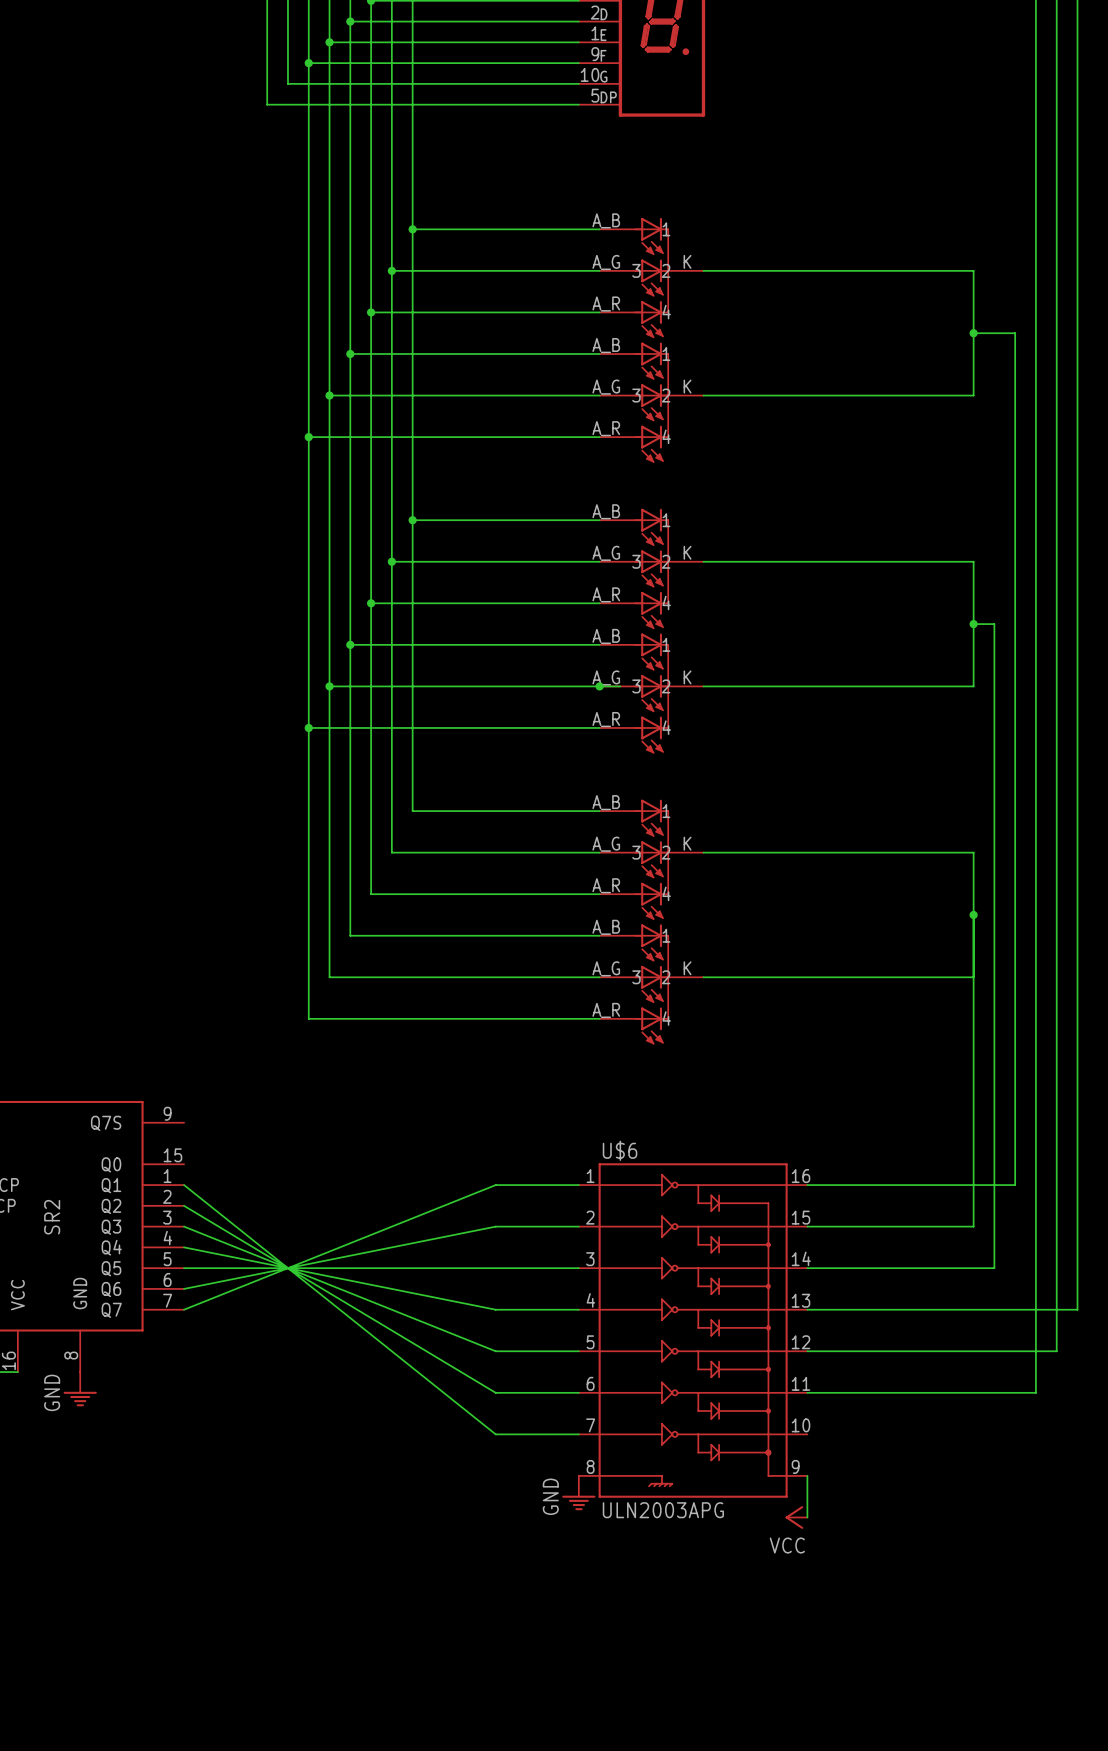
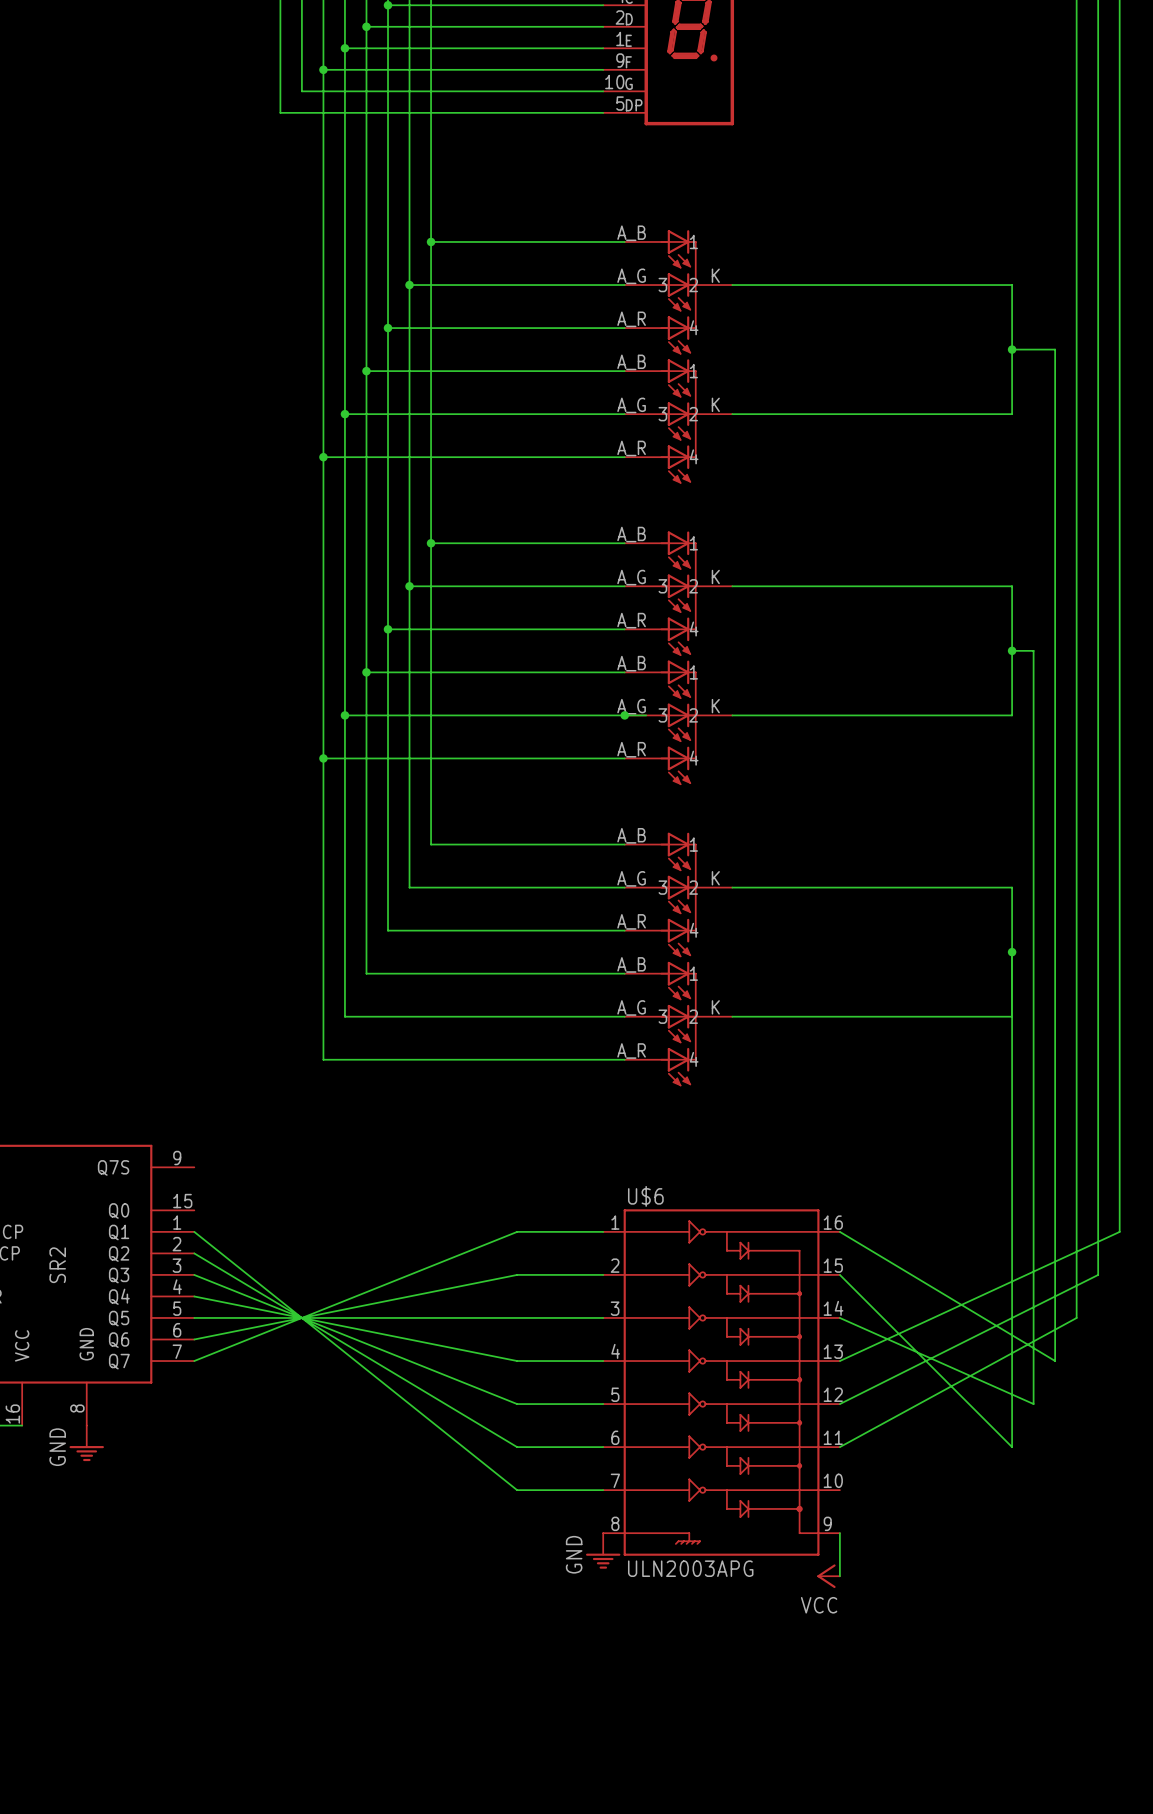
wire: (807, 1185) (1015, 1185) -> (839, 1231) (1055, 1361) (1055, 1231)
wire: (1077, 1185) (1077, 1309) (807, 1309) -> (1119, 1231) (839, 1361)
wire: (807, 1226) (973, 1226) -> (839, 1274) (1012, 1447) (1012, 1274)
wire: (1056, 1226) (1056, 1351) (807, 1351) -> (1098, 1274) (839, 1404)
wire: (807, 1268) (994, 1268) -> (839, 1317) (1033, 1404) (1033, 1317)
wire: (1035, 1268) (1035, 1392) (807, 1392) -> (1076, 1317) (839, 1447)

